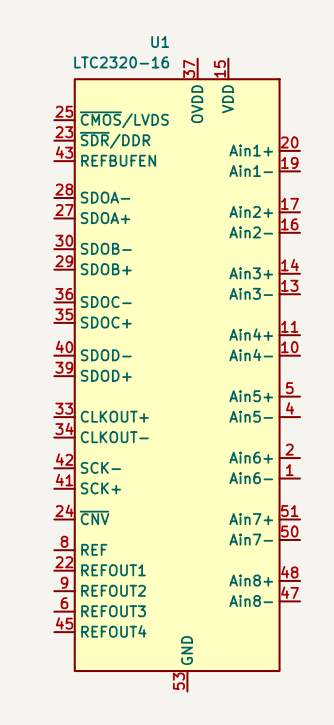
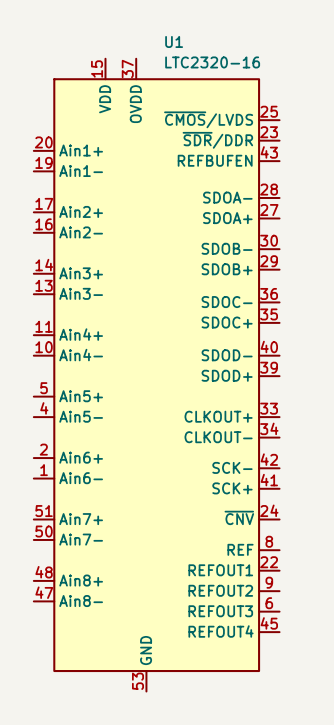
U1 flip: as is (177, 375) -> left-right (156, 375)

